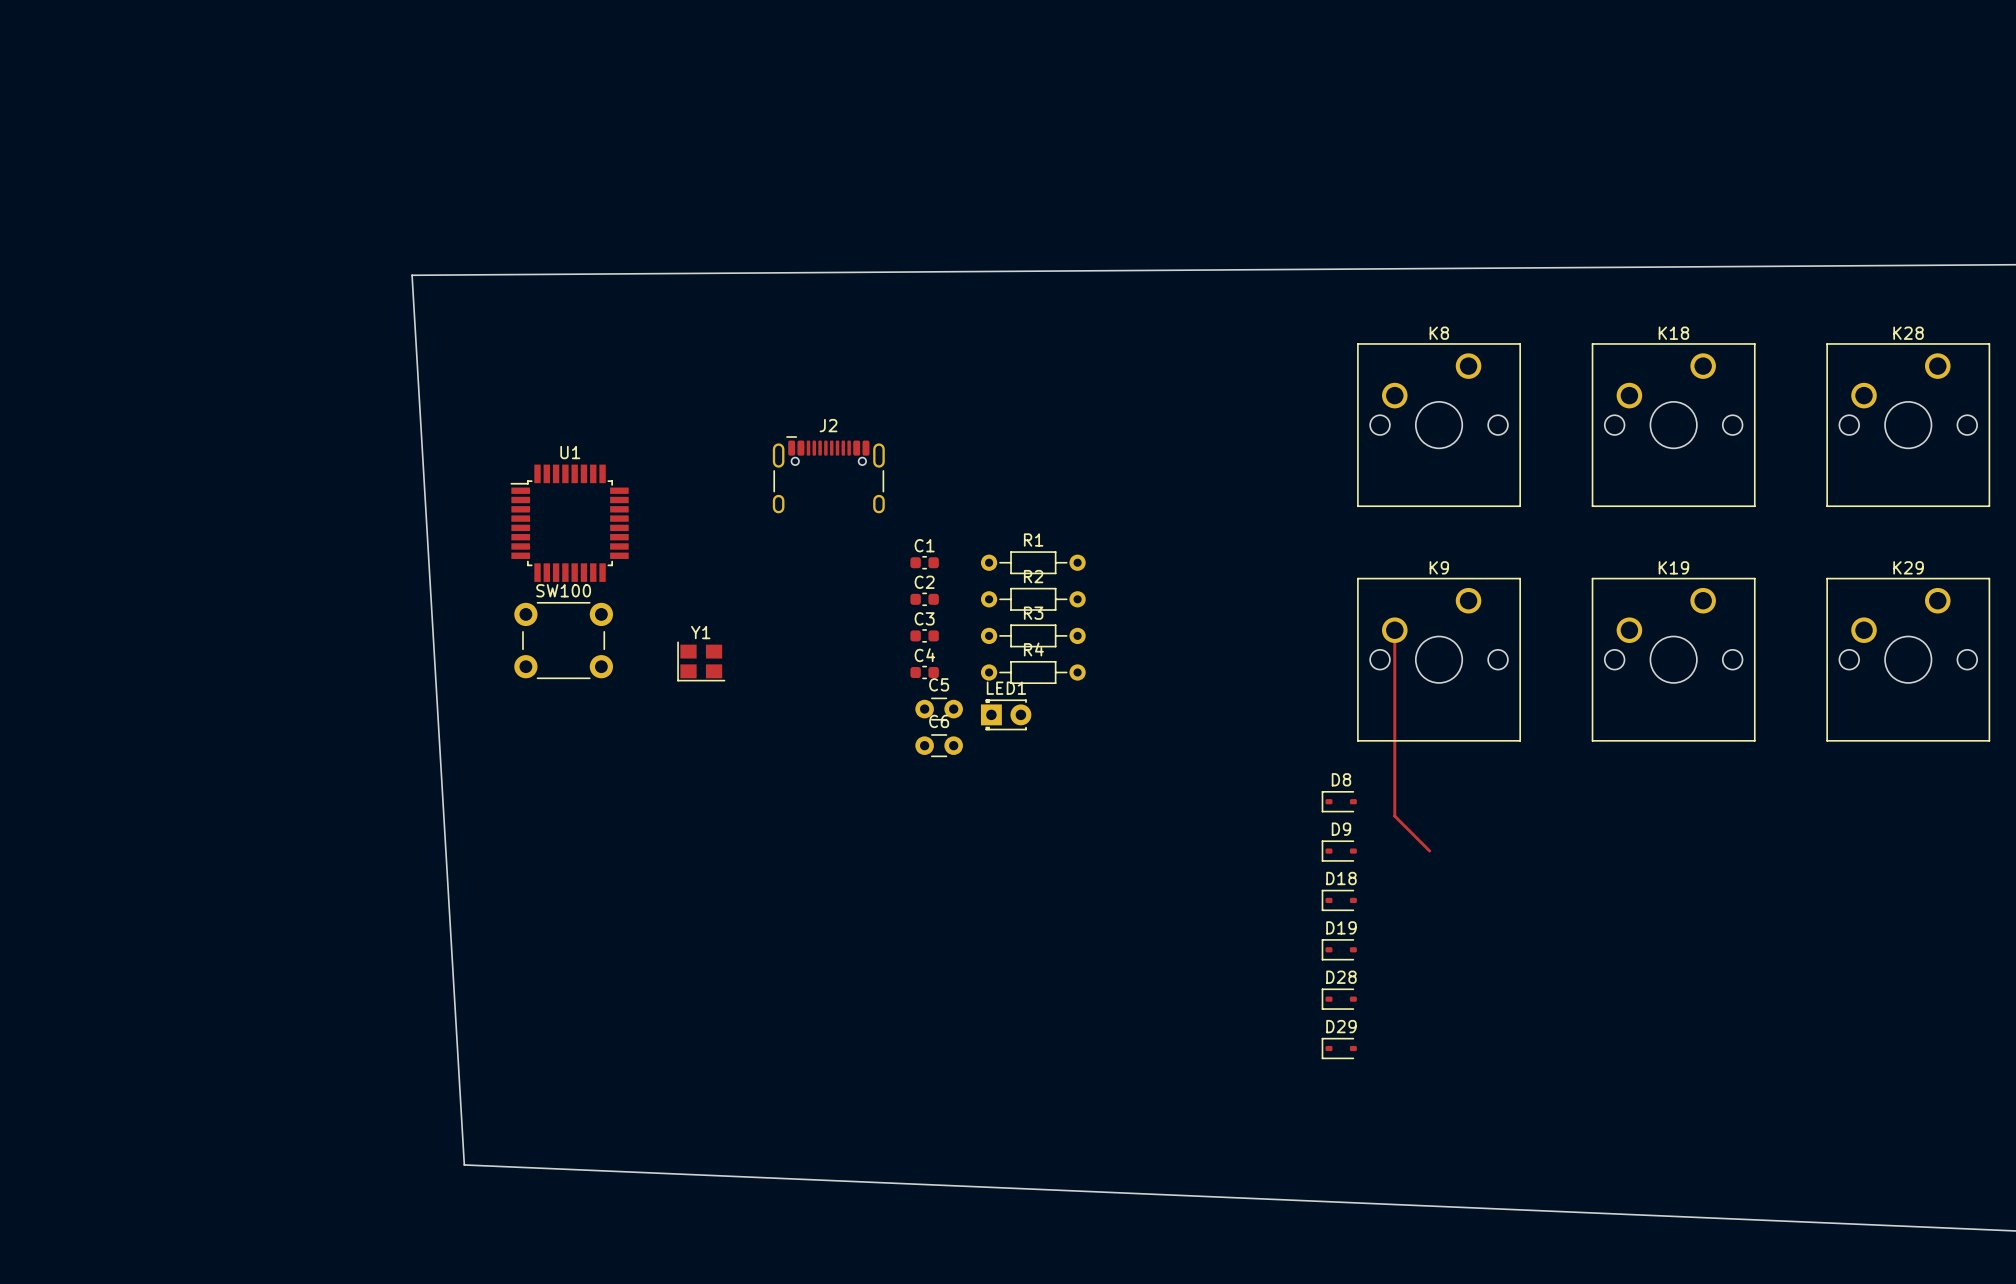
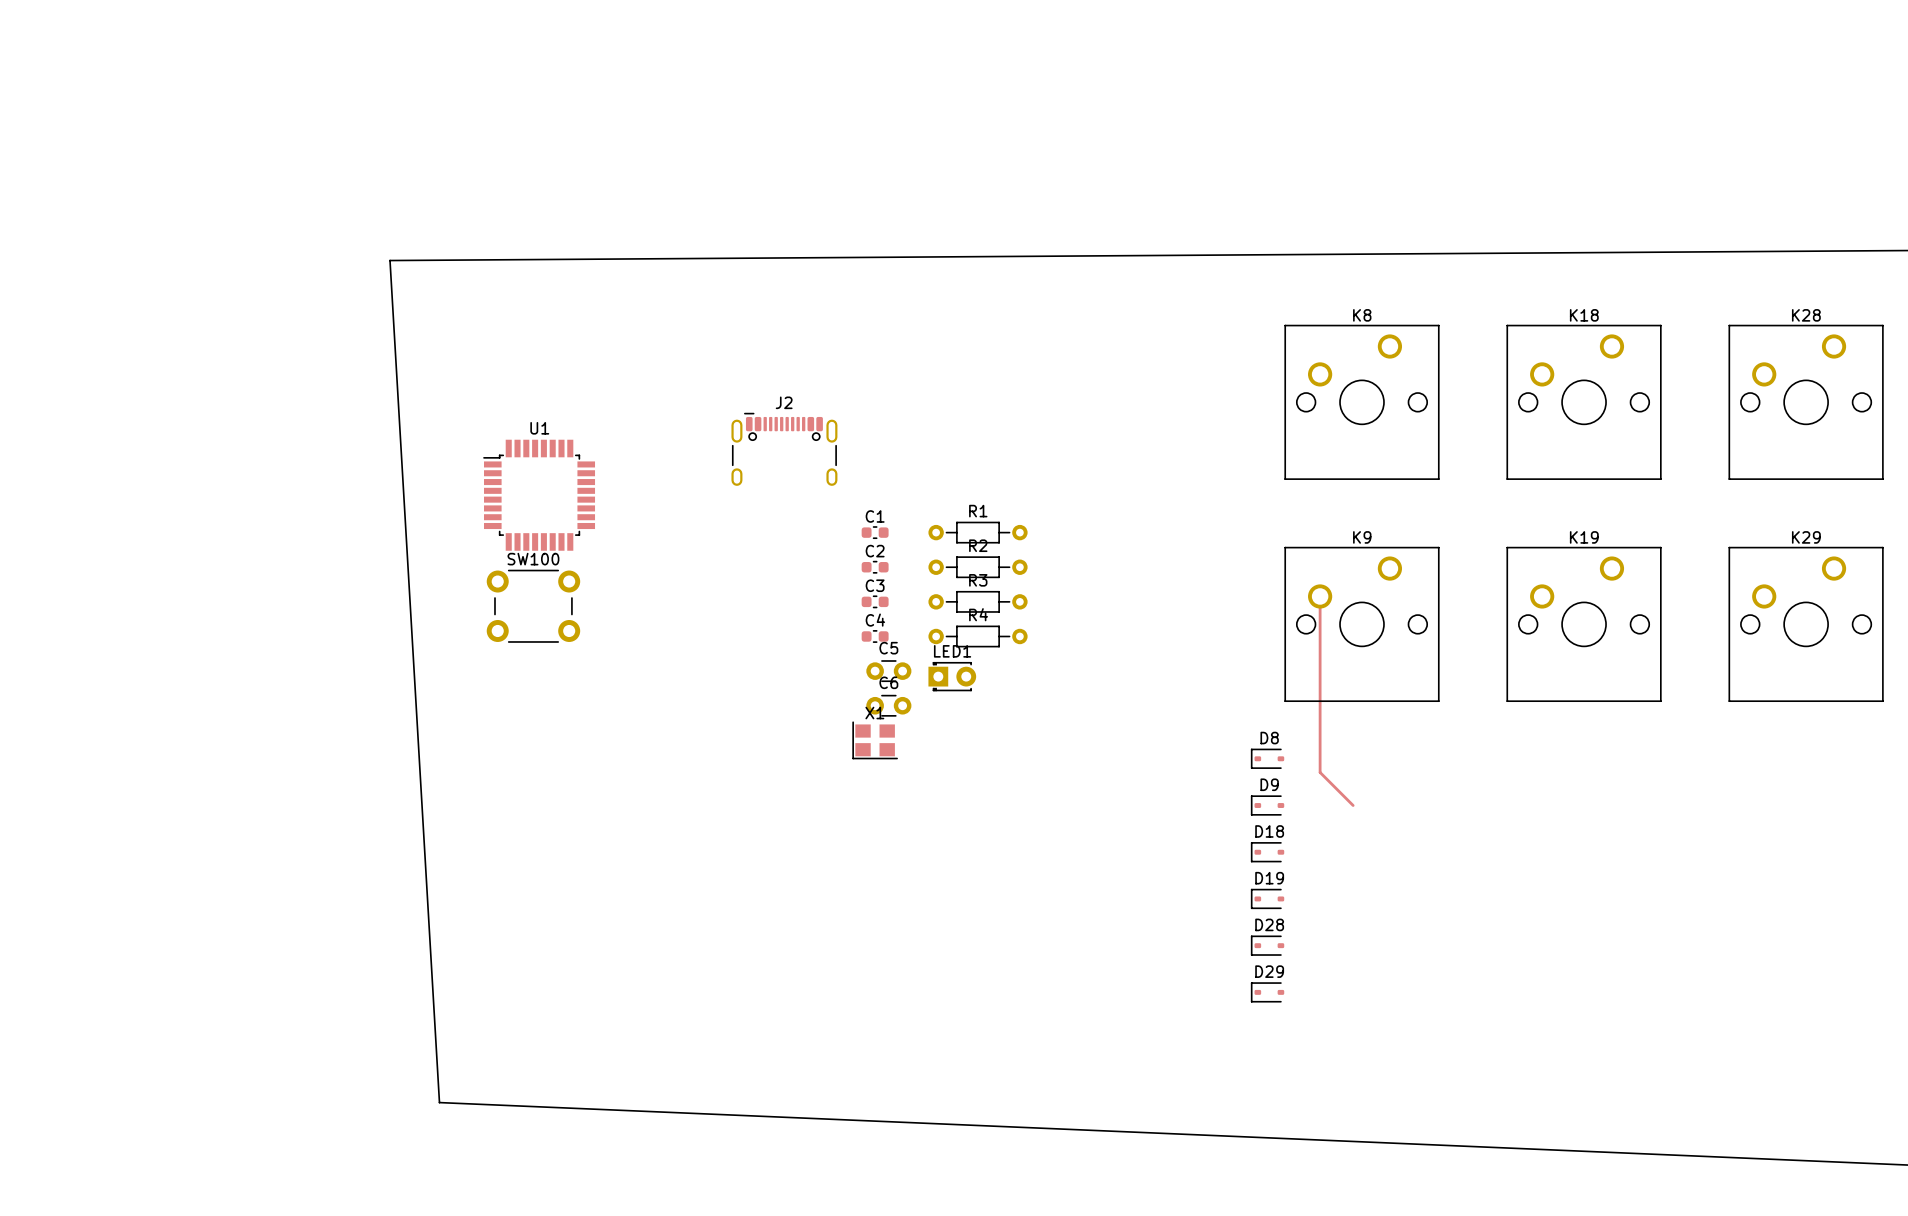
Y1: (701, 661) -> none
X1: none -> (875, 740)

